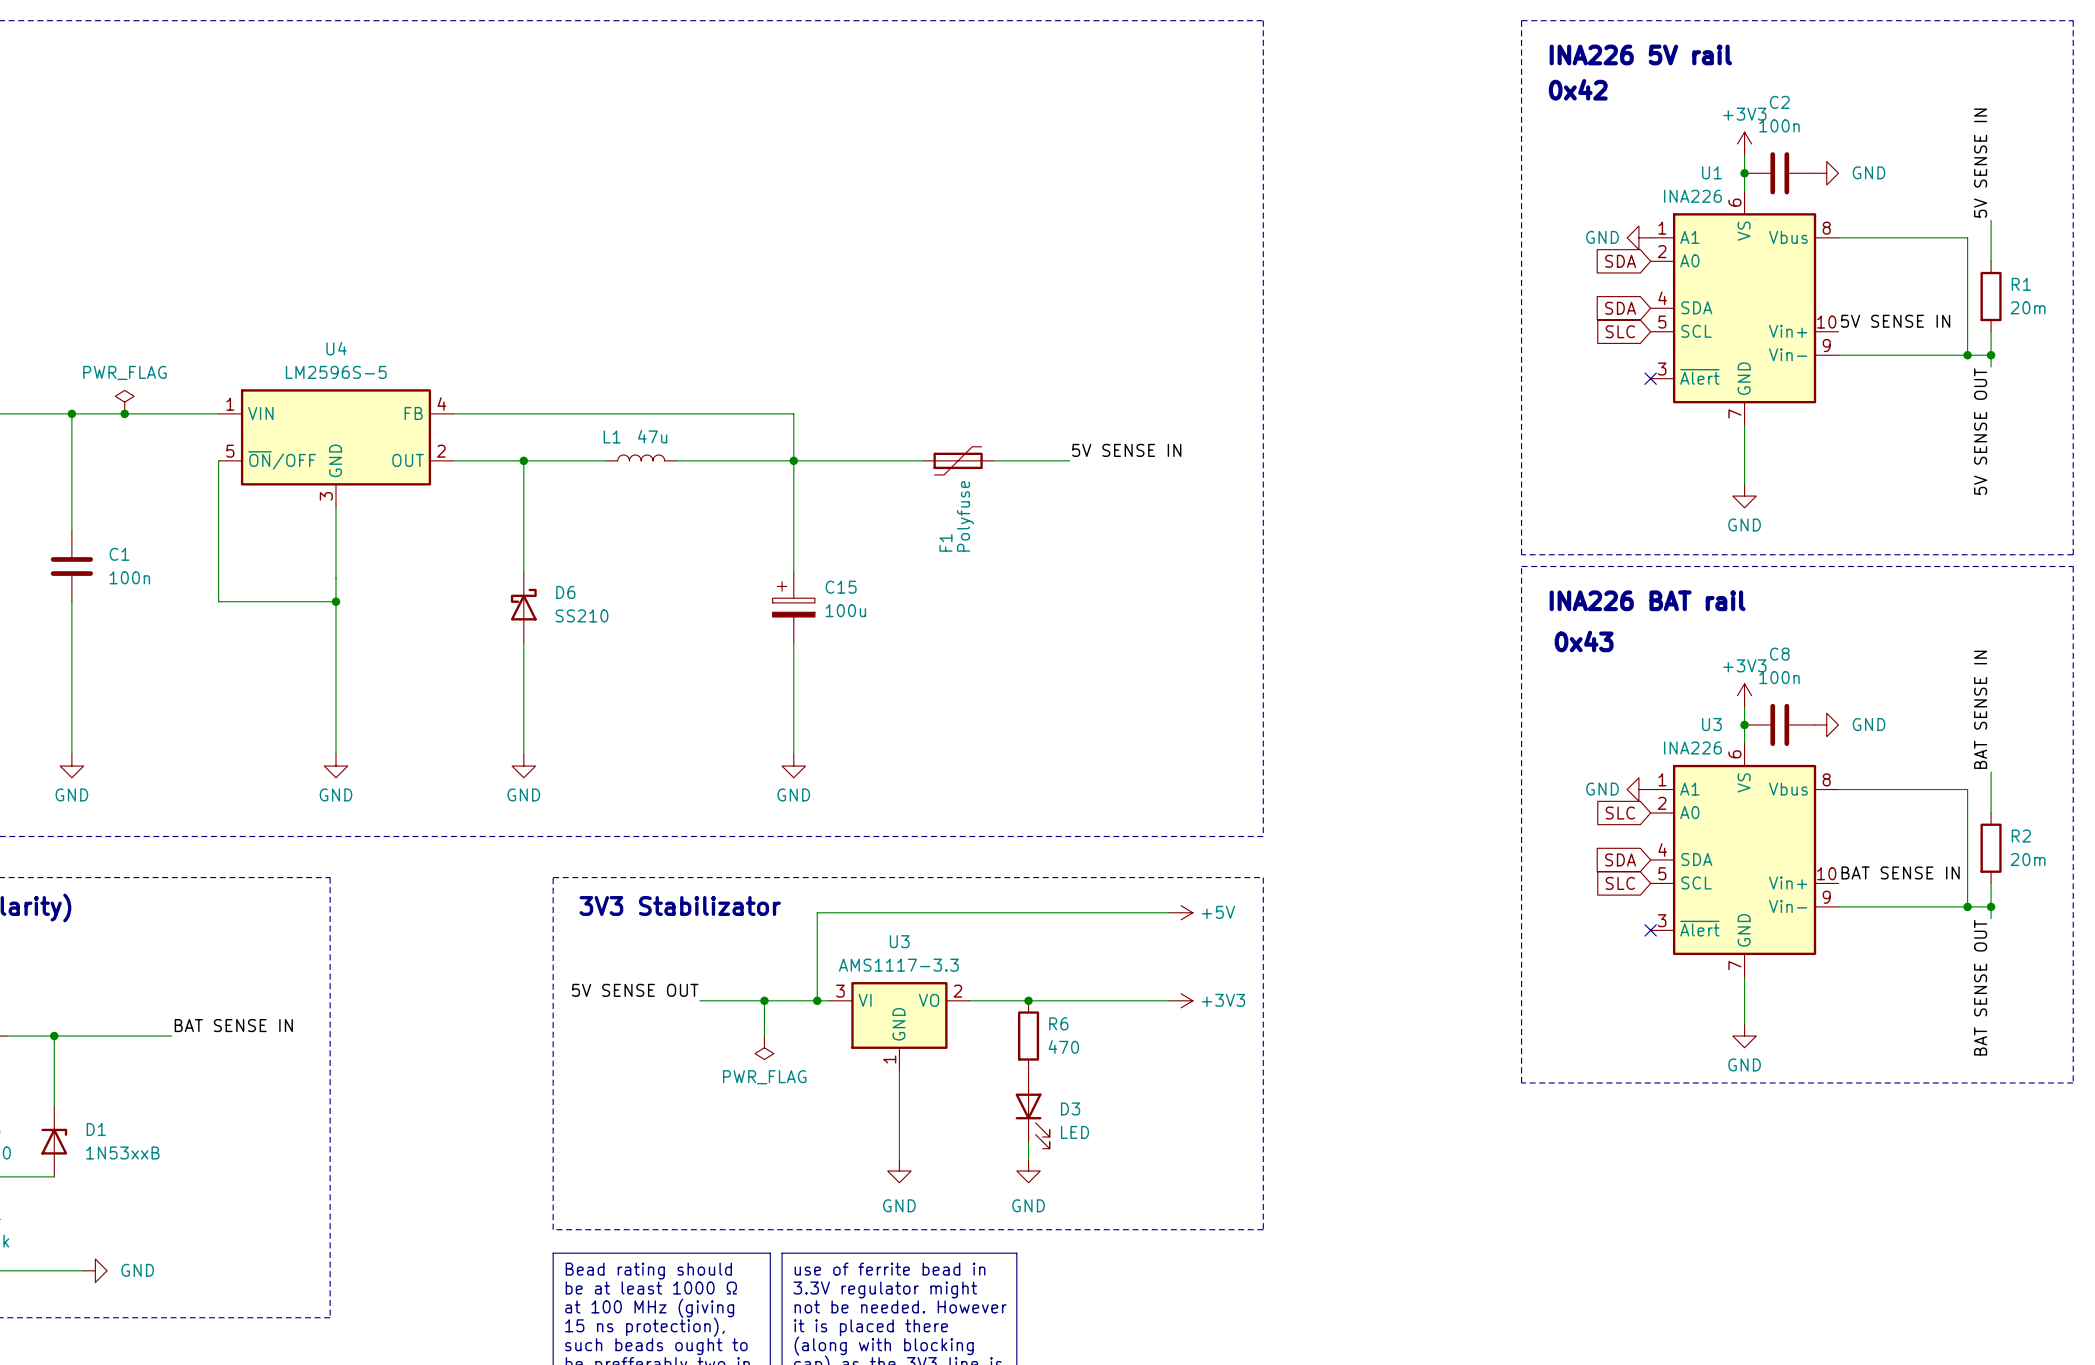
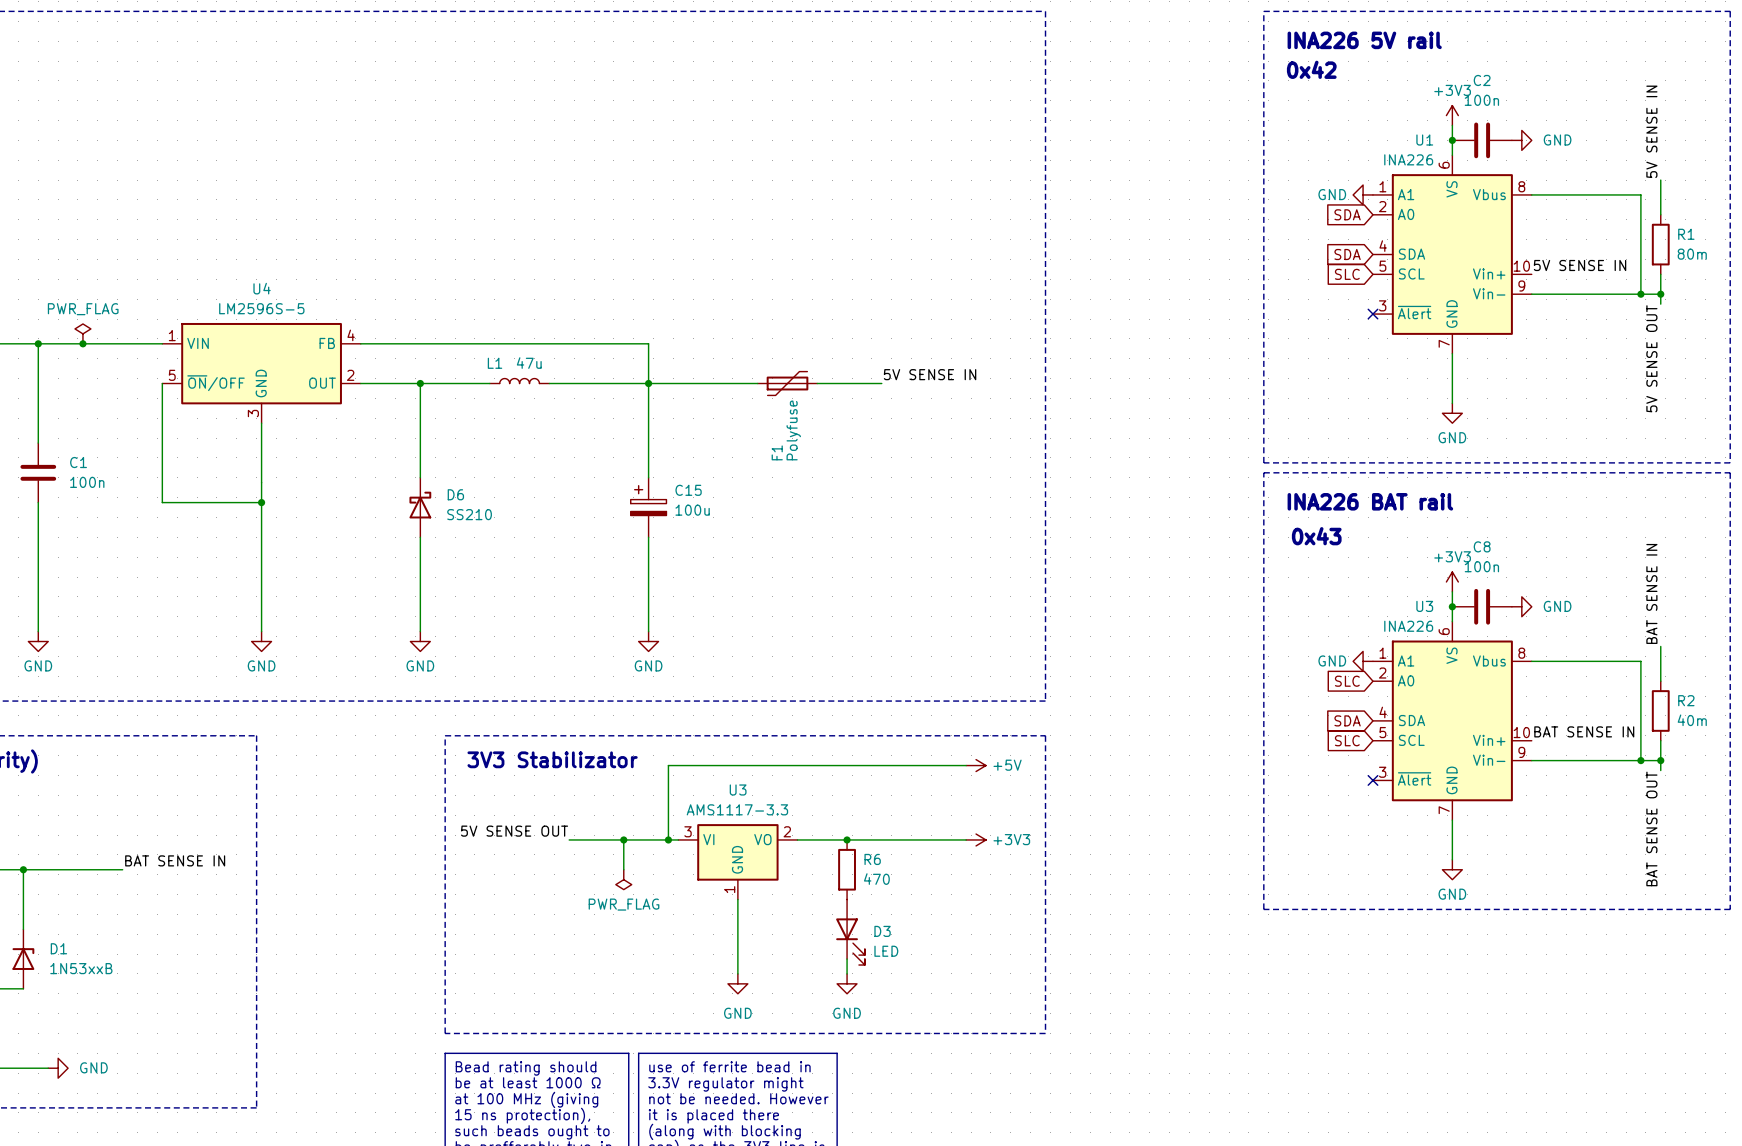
R1 value: 20m (2028, 307) -> 80m (1692, 254)
R2 value: 20m (2028, 859) -> 40m (1692, 720)

